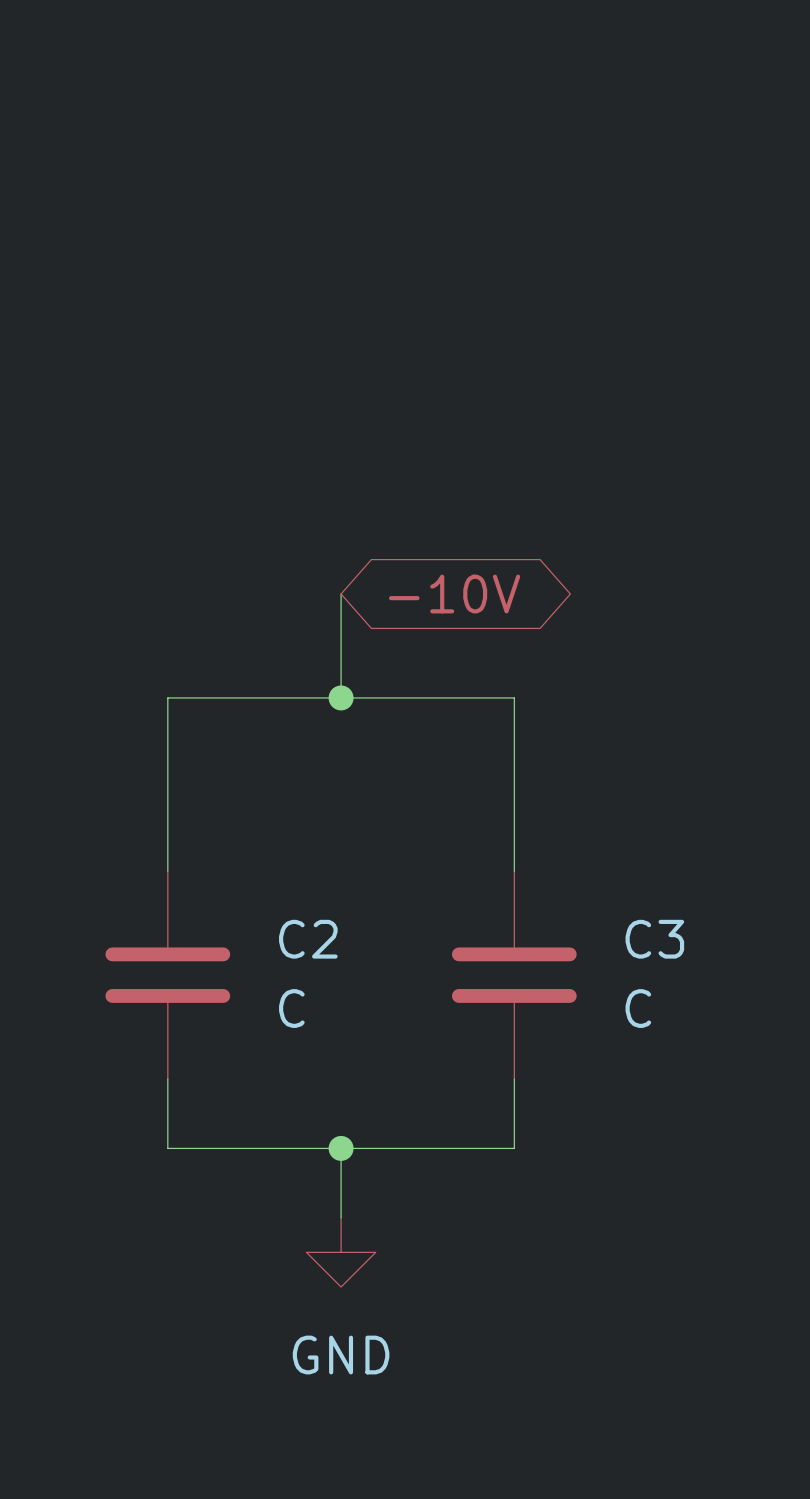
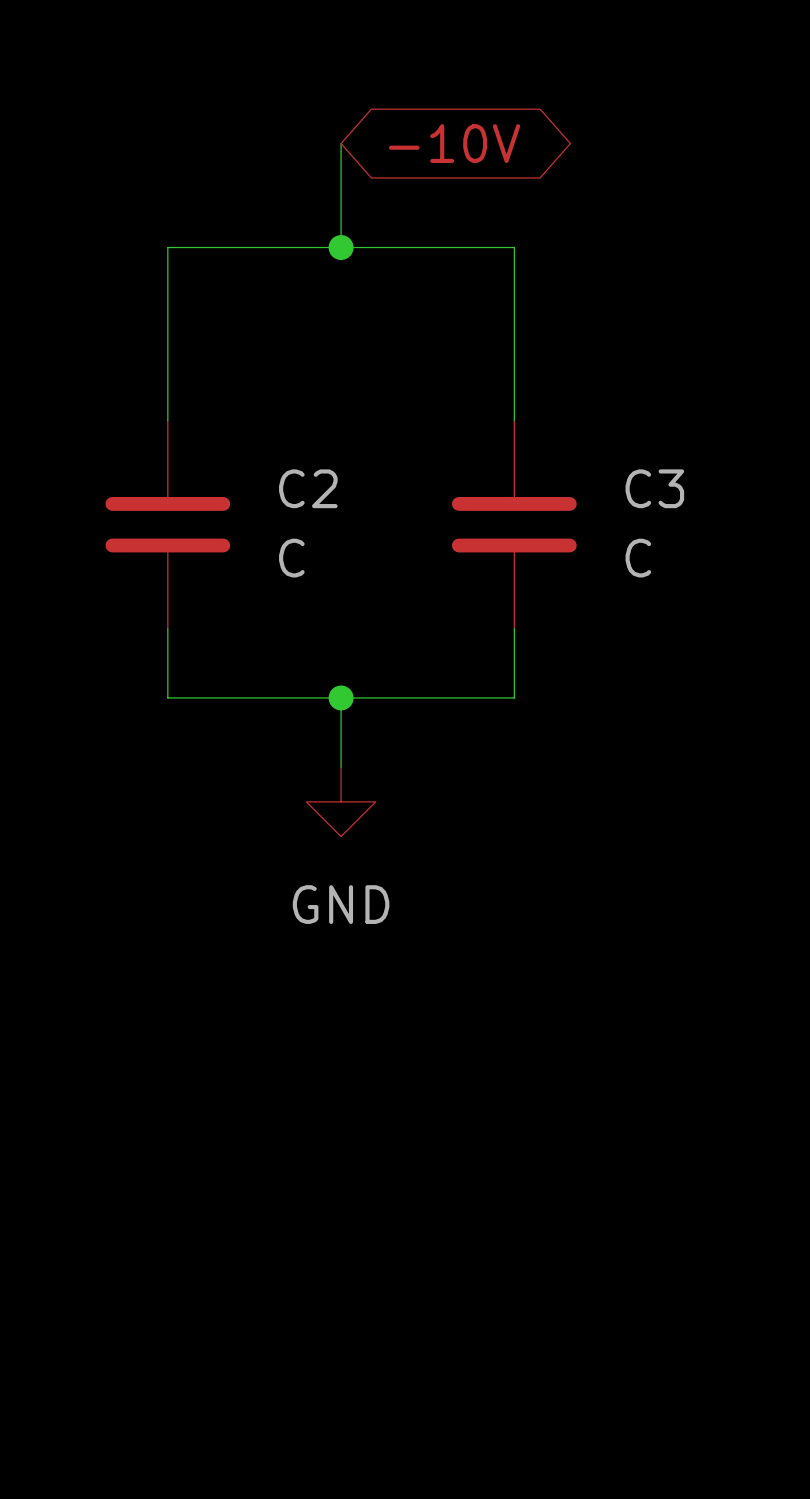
wire: none -> (341, 143) (341, 247)
junction: none -> (341, 247)
wire: none -> (167, 420) (167, 247) (514, 247) (514, 420)
wire: (341, 594) (341, 697) -> (341, 767) (341, 697)
global label position: -10V (454, 594) -> -10V (454, 143)
wire: (167, 697) (167, 871) -> (167, 697) (167, 628)
wire: (514, 697) (514, 871) -> (514, 697) (514, 628)
C2 position: (167, 975) -> (167, 524)
C3 position: (514, 975) -> (514, 524)
wire: (167, 1079) (167, 1148) (514, 1148) (514, 1079) -> none
wire: (341, 1148) (341, 1217) -> none
junction: (341, 1148) -> none
power symbol position: GND (341, 1252) -> GND (341, 801)

